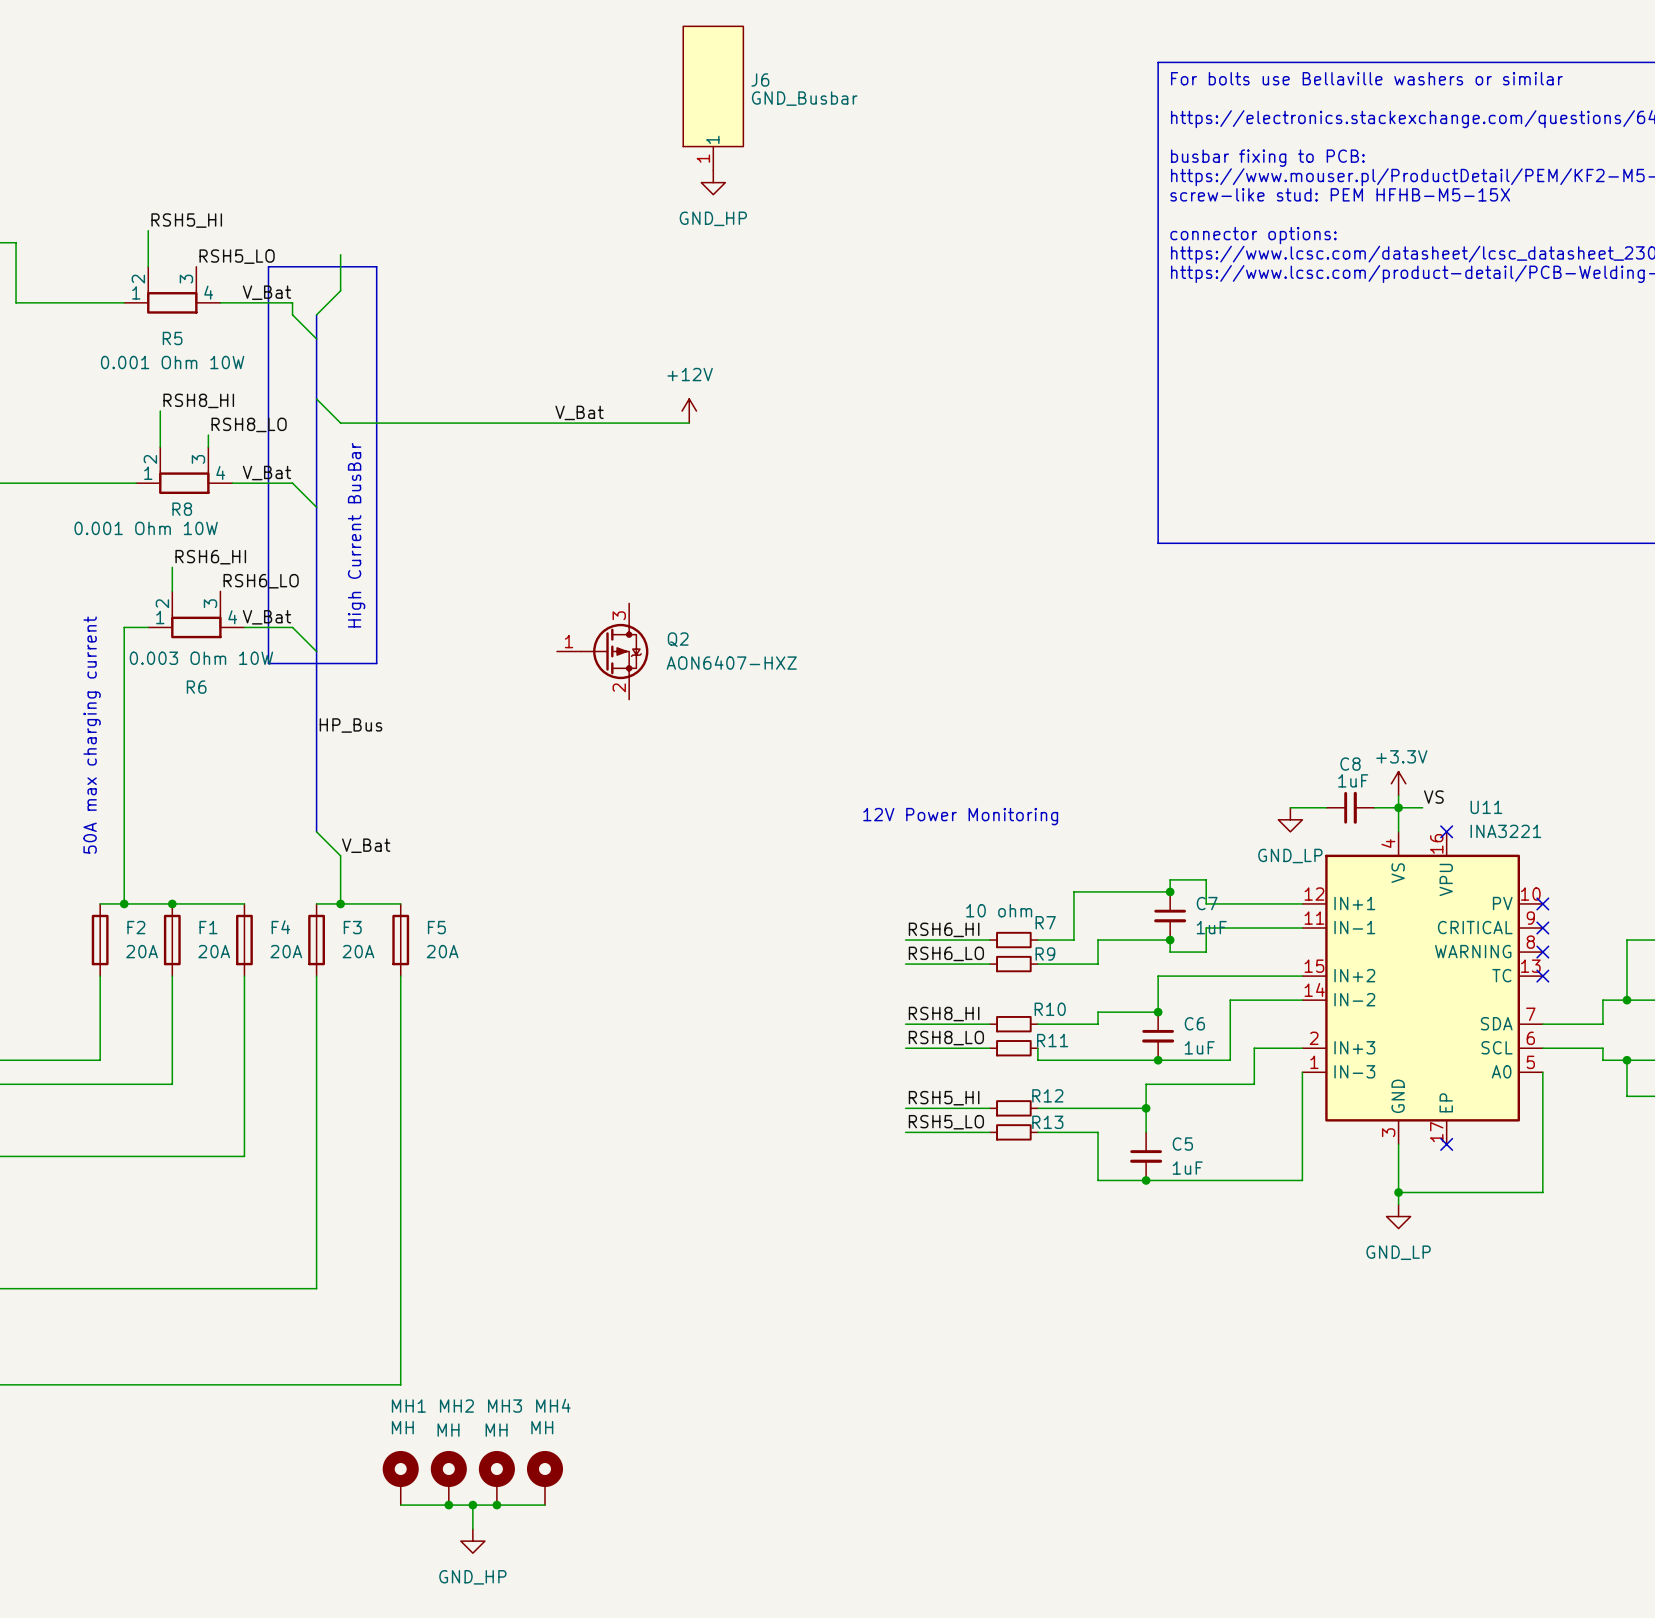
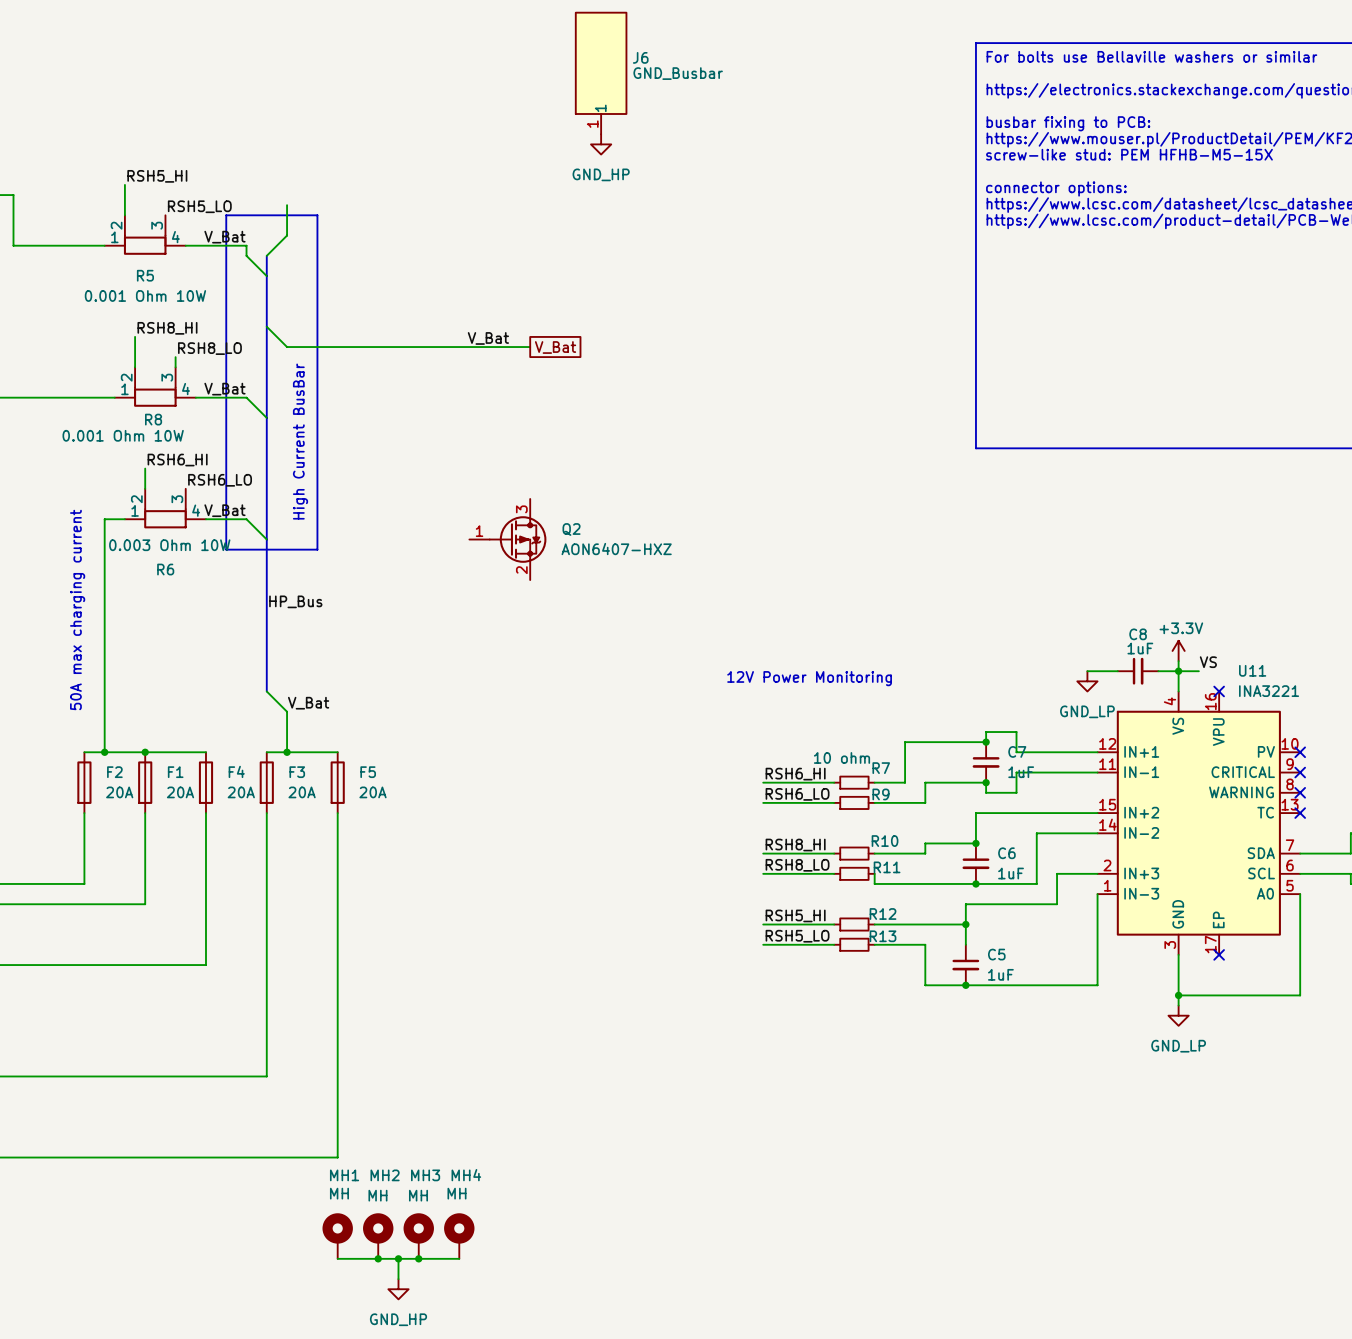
power symbol: +12V (689, 411) -> none
wire: (629, 423) (689, 423) -> none
global label: none -> V_Bat (555, 347)

